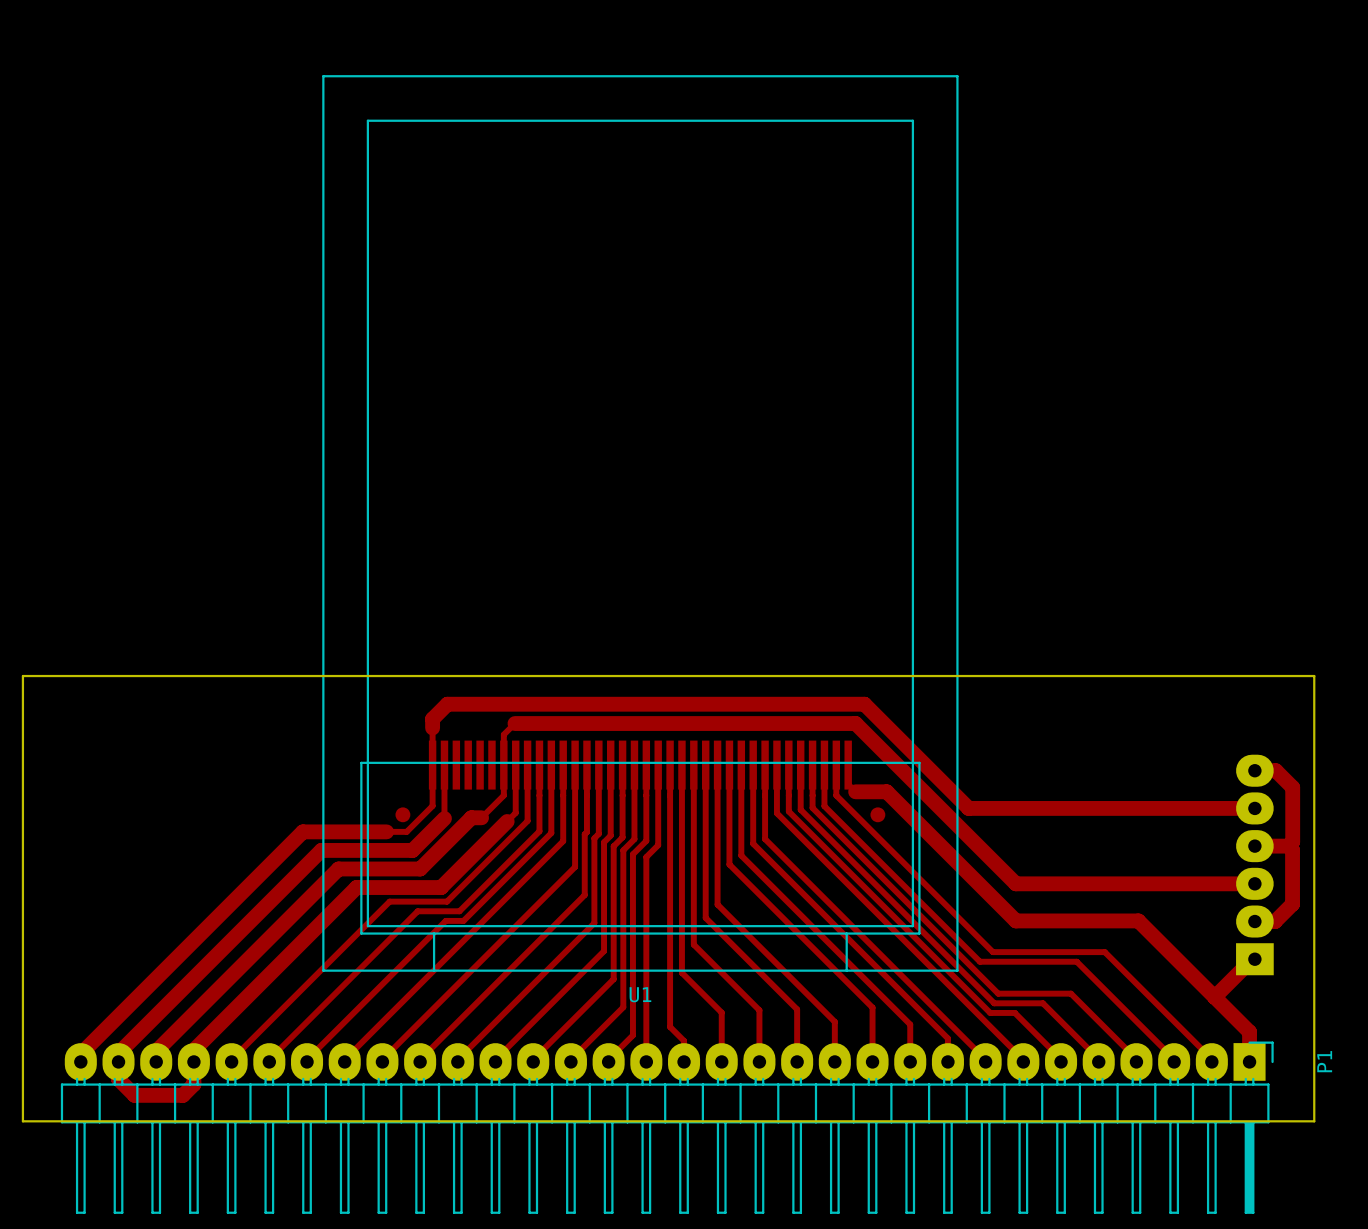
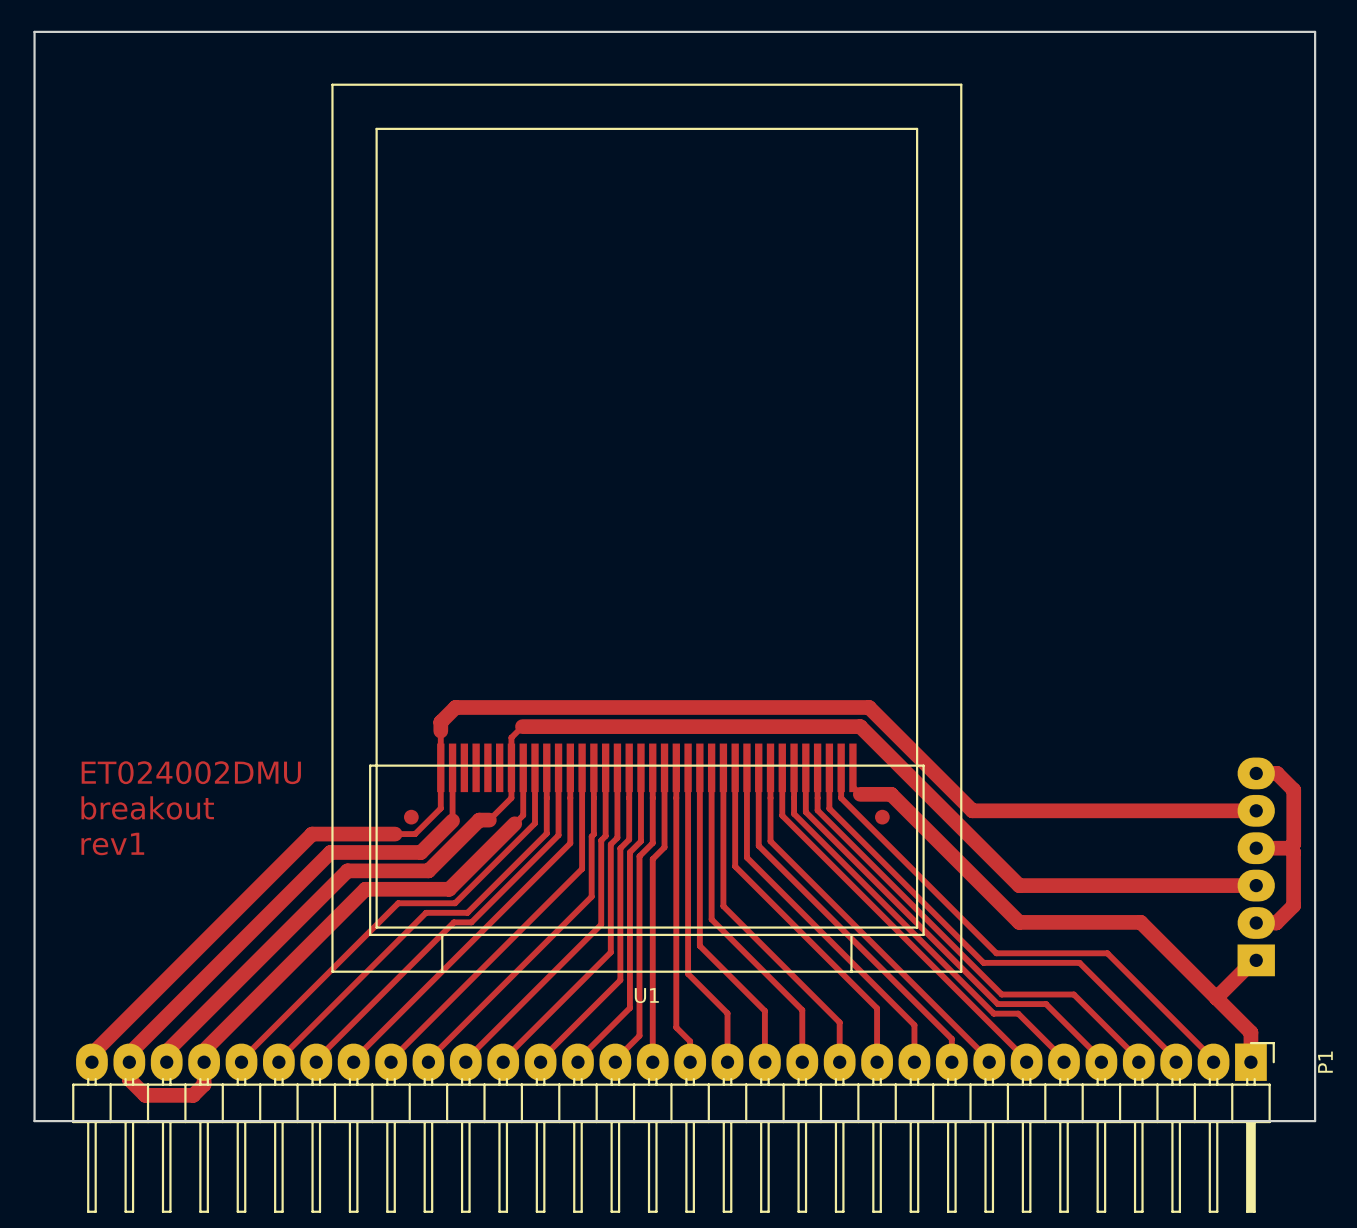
board edge: (22, 676) (1314, 676) -> (34, 679) (34, 31) (1315, 31) (1315, 679)
text: none -> ET024002DMU (191, 772)
text: none -> breakout (147, 807)
text: none -> rev1 (112, 843)

